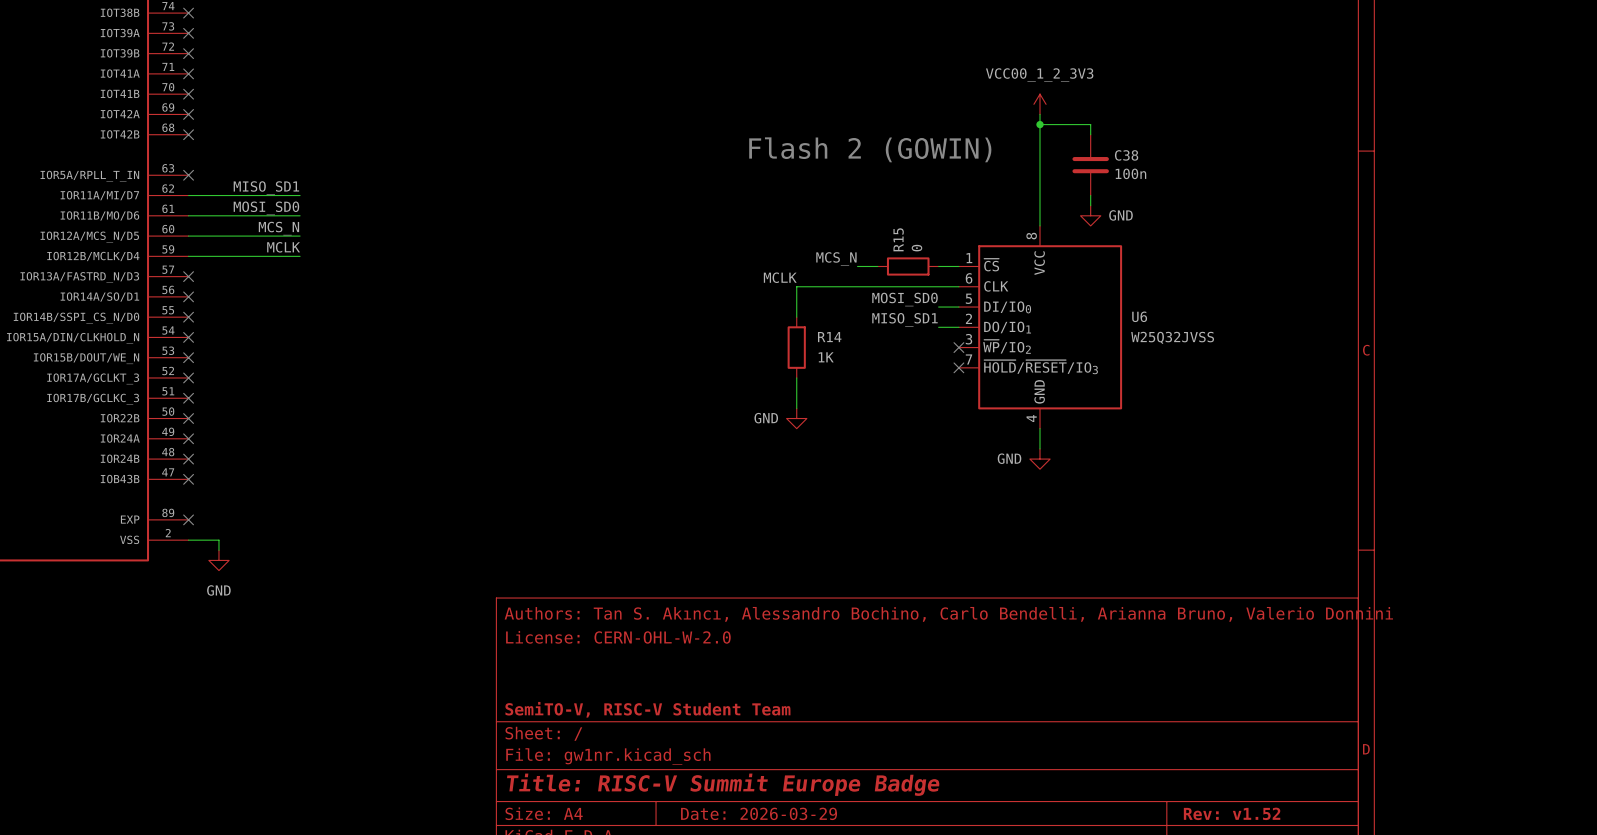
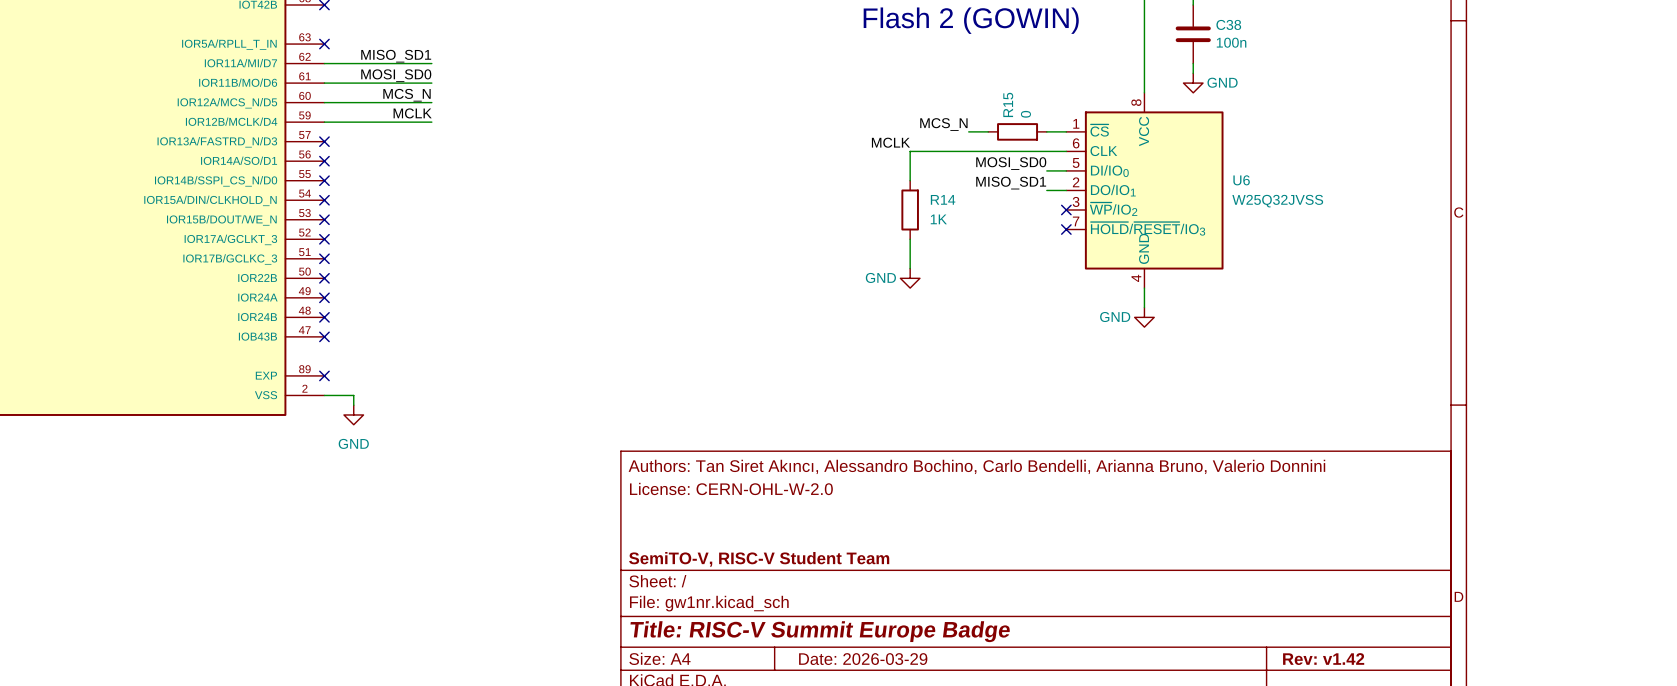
title block: Authors: Tan S. Akıncı, Alessandro Bochino, Carlo Bendelli, Arianna Bruno, Valerio Donnini (948, 614) -> Authors: Tan Siret Akıncı, Alessandro Bochino, Carlo Bendelli, Arianna Bruno, Valerio Donnini (976, 466)
title block: Rev: v1.52 (1232, 813) -> Rev: v1.42 (1323, 659)

